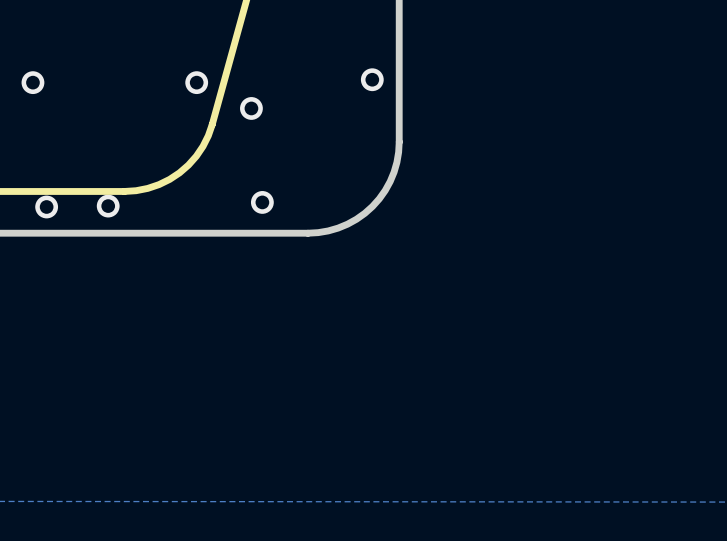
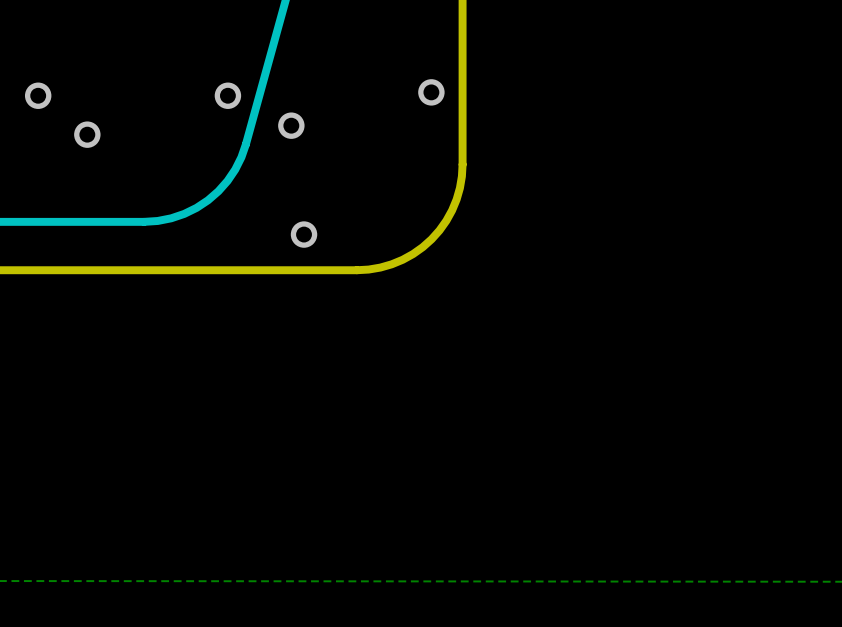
via: none -> (87, 134)
via: (46, 206) -> none
via: (108, 206) -> none

